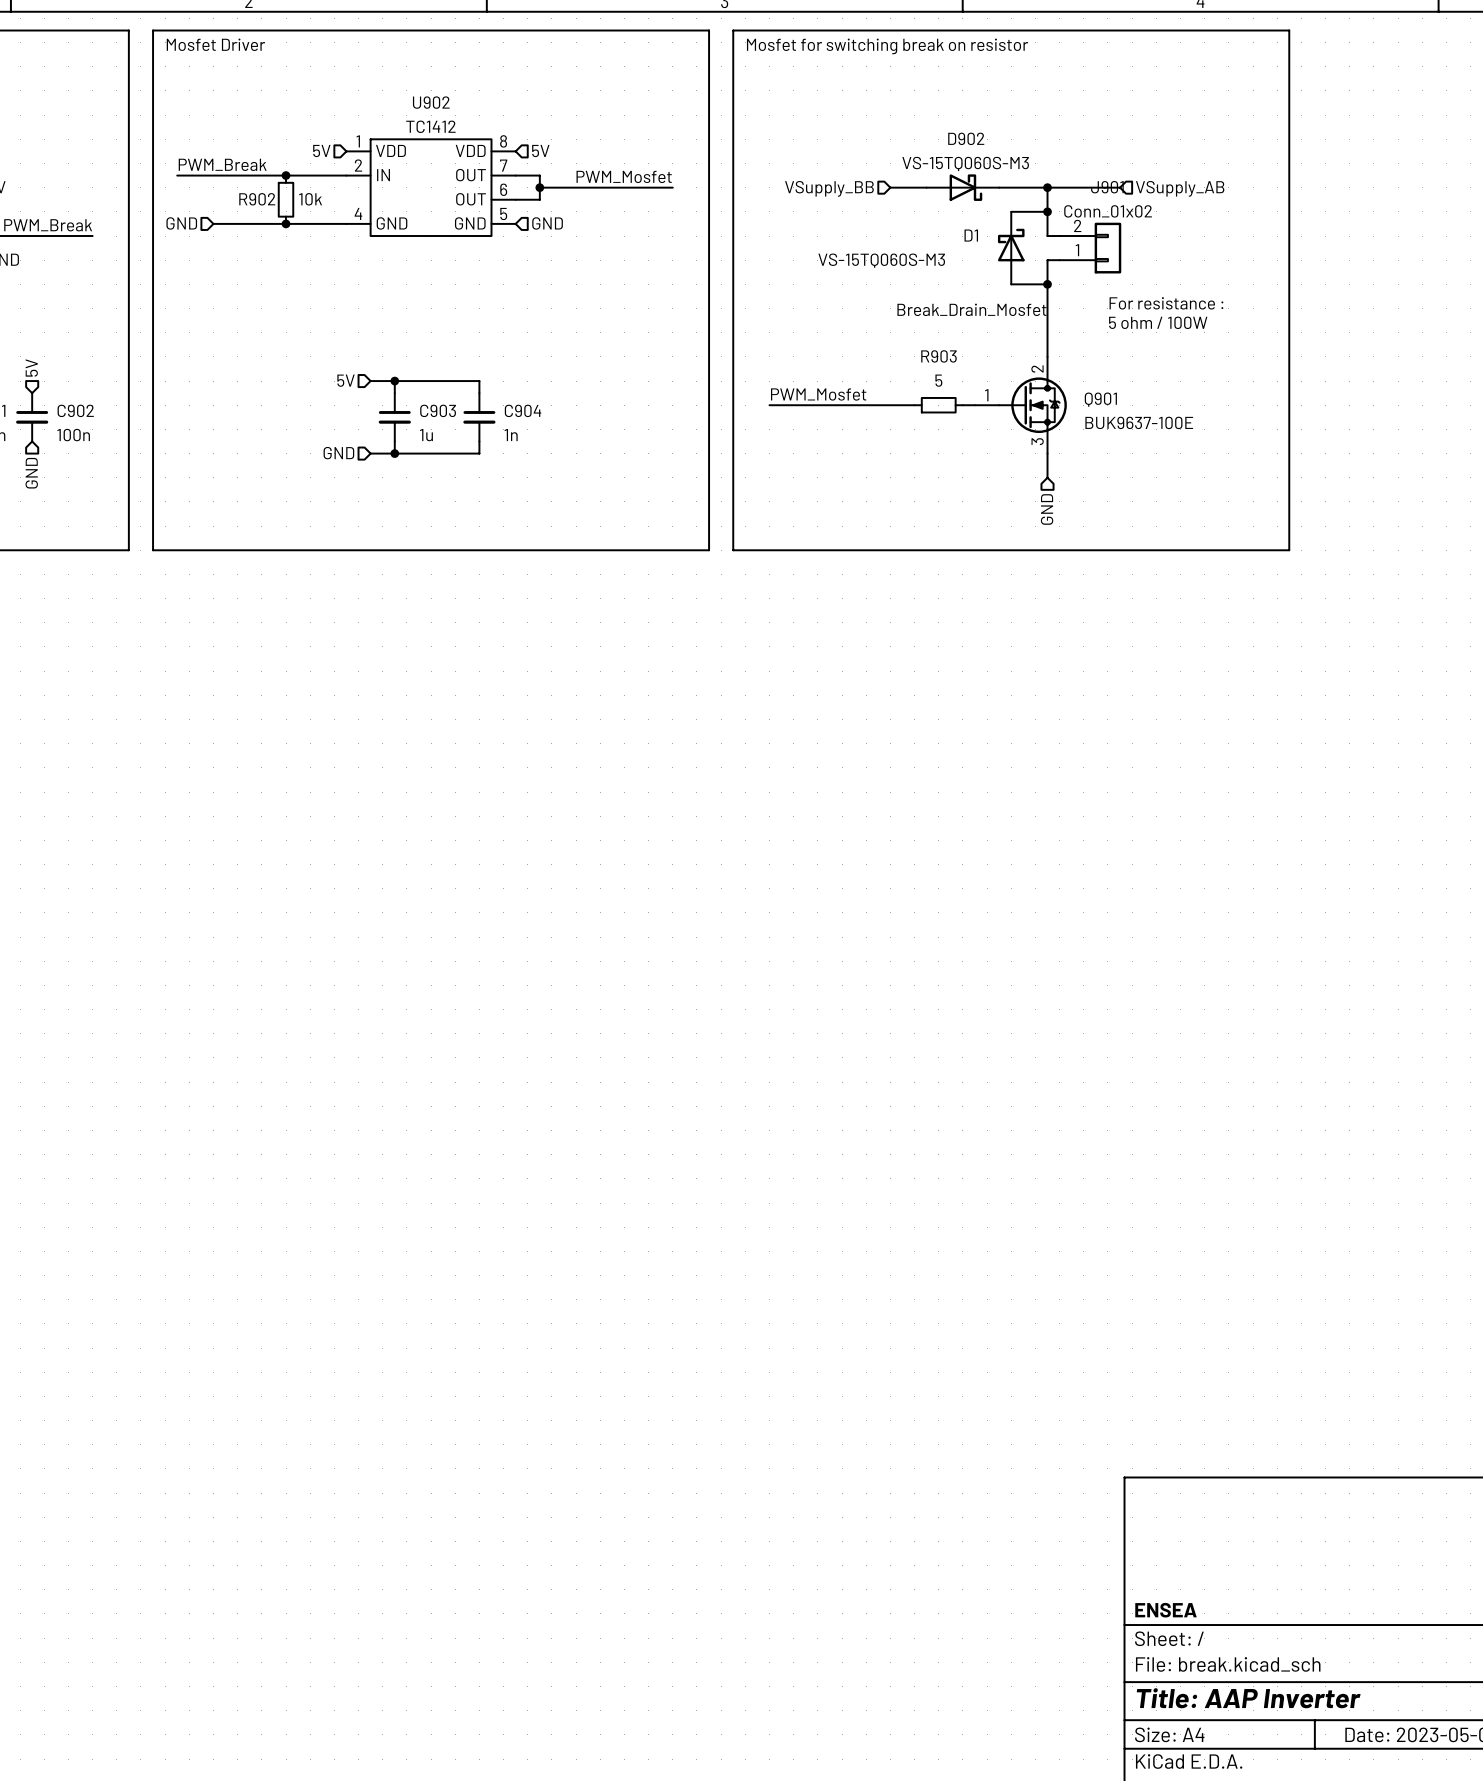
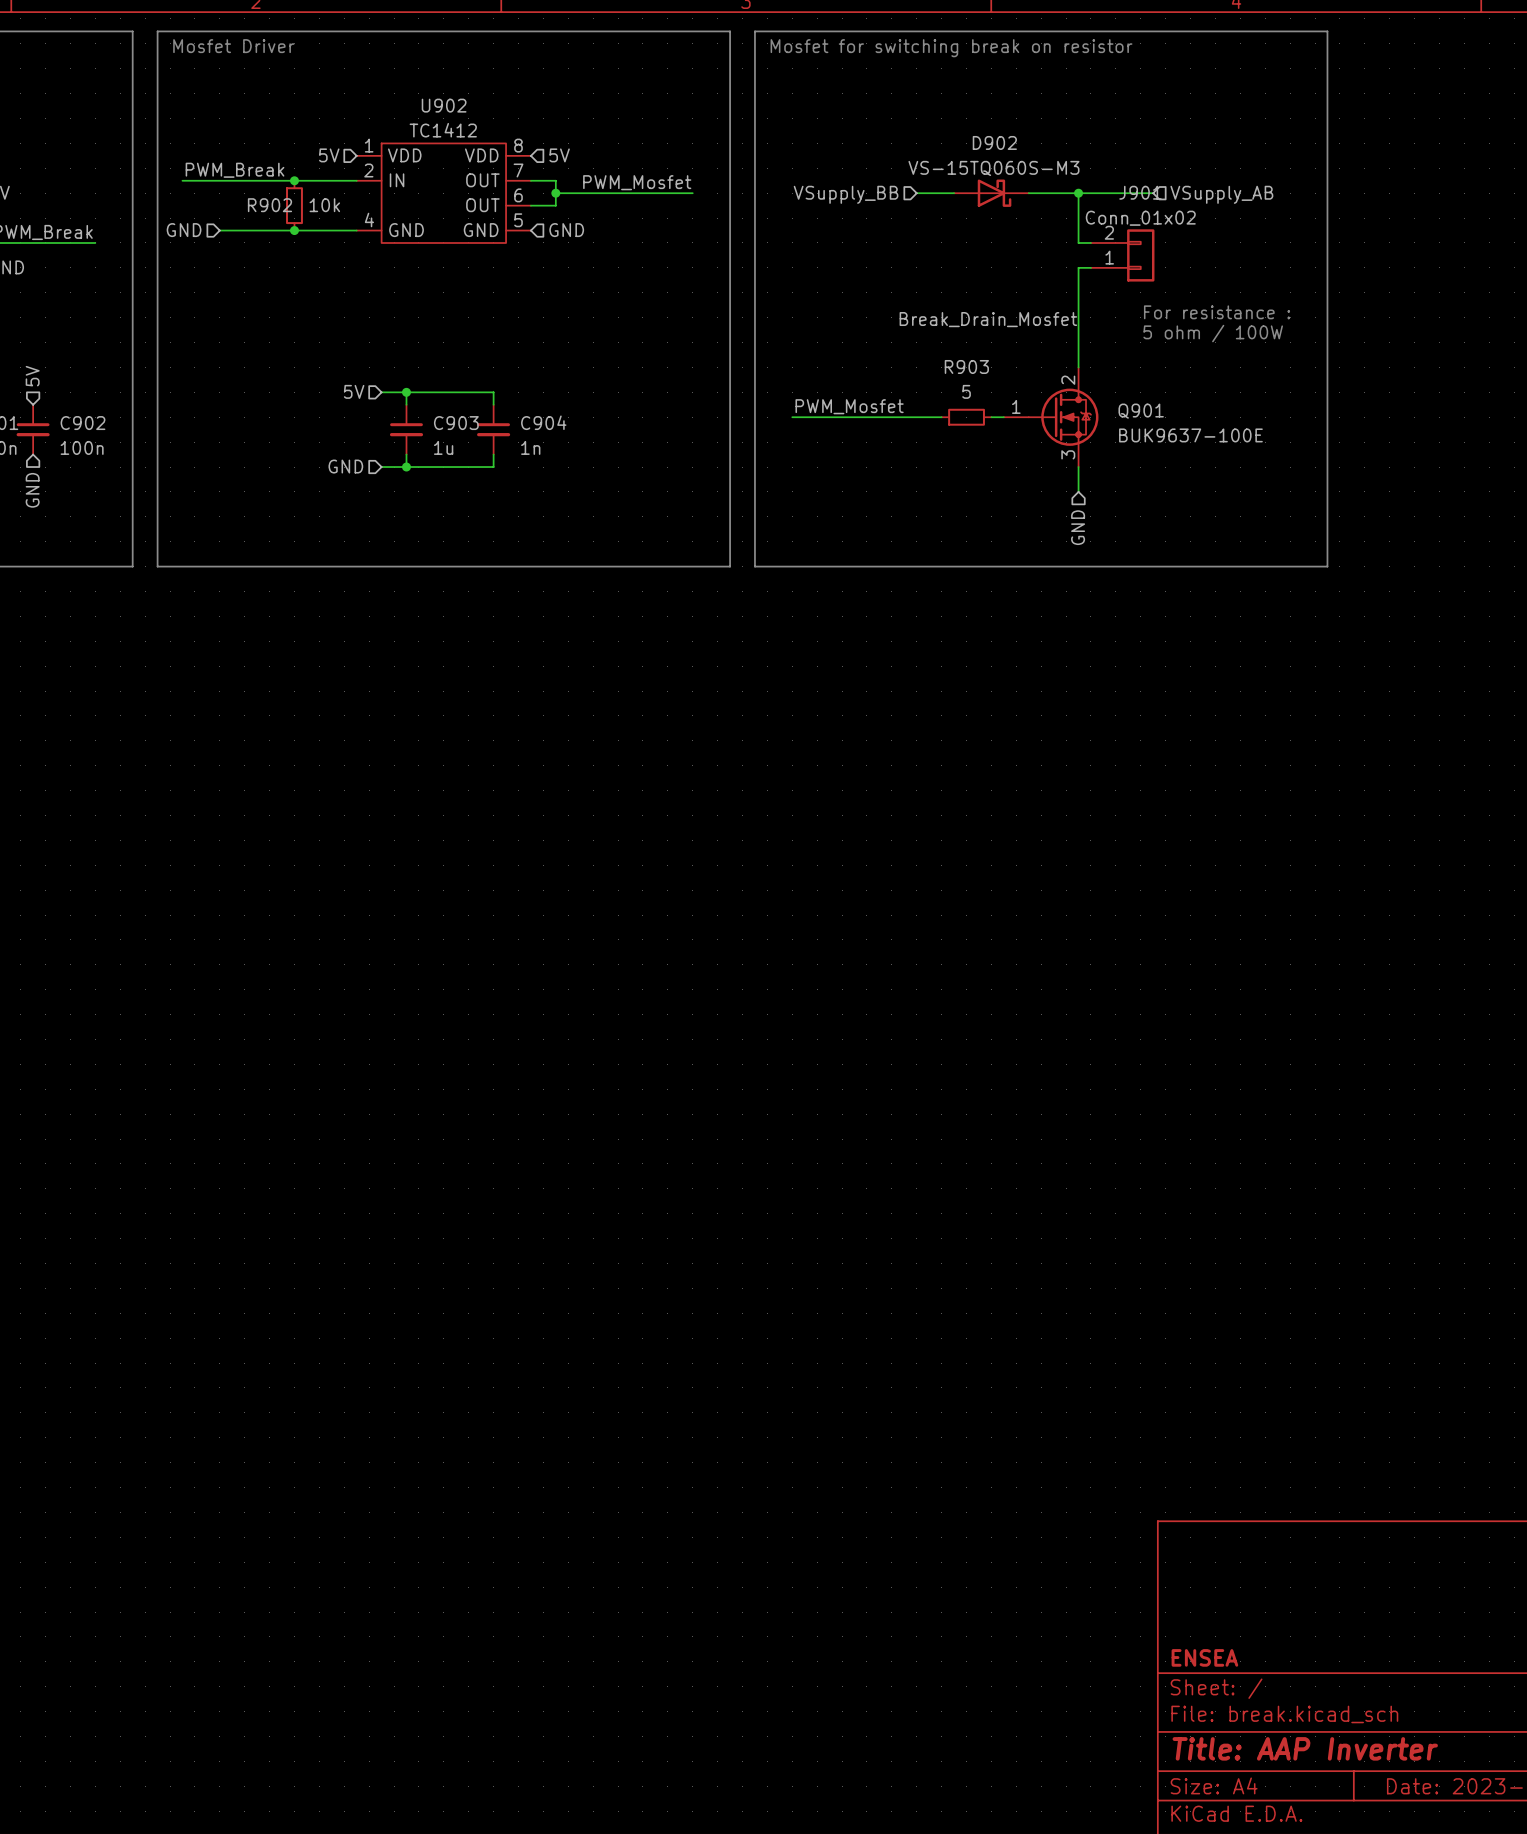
wire: (1011, 211) (1047, 211) -> none
junction: (1047, 211) -> none
D1: VS-15TQ060S-M3 (1011, 248) -> none
wire: (1011, 284) (1047, 284) -> none
junction: (1047, 284) -> none

